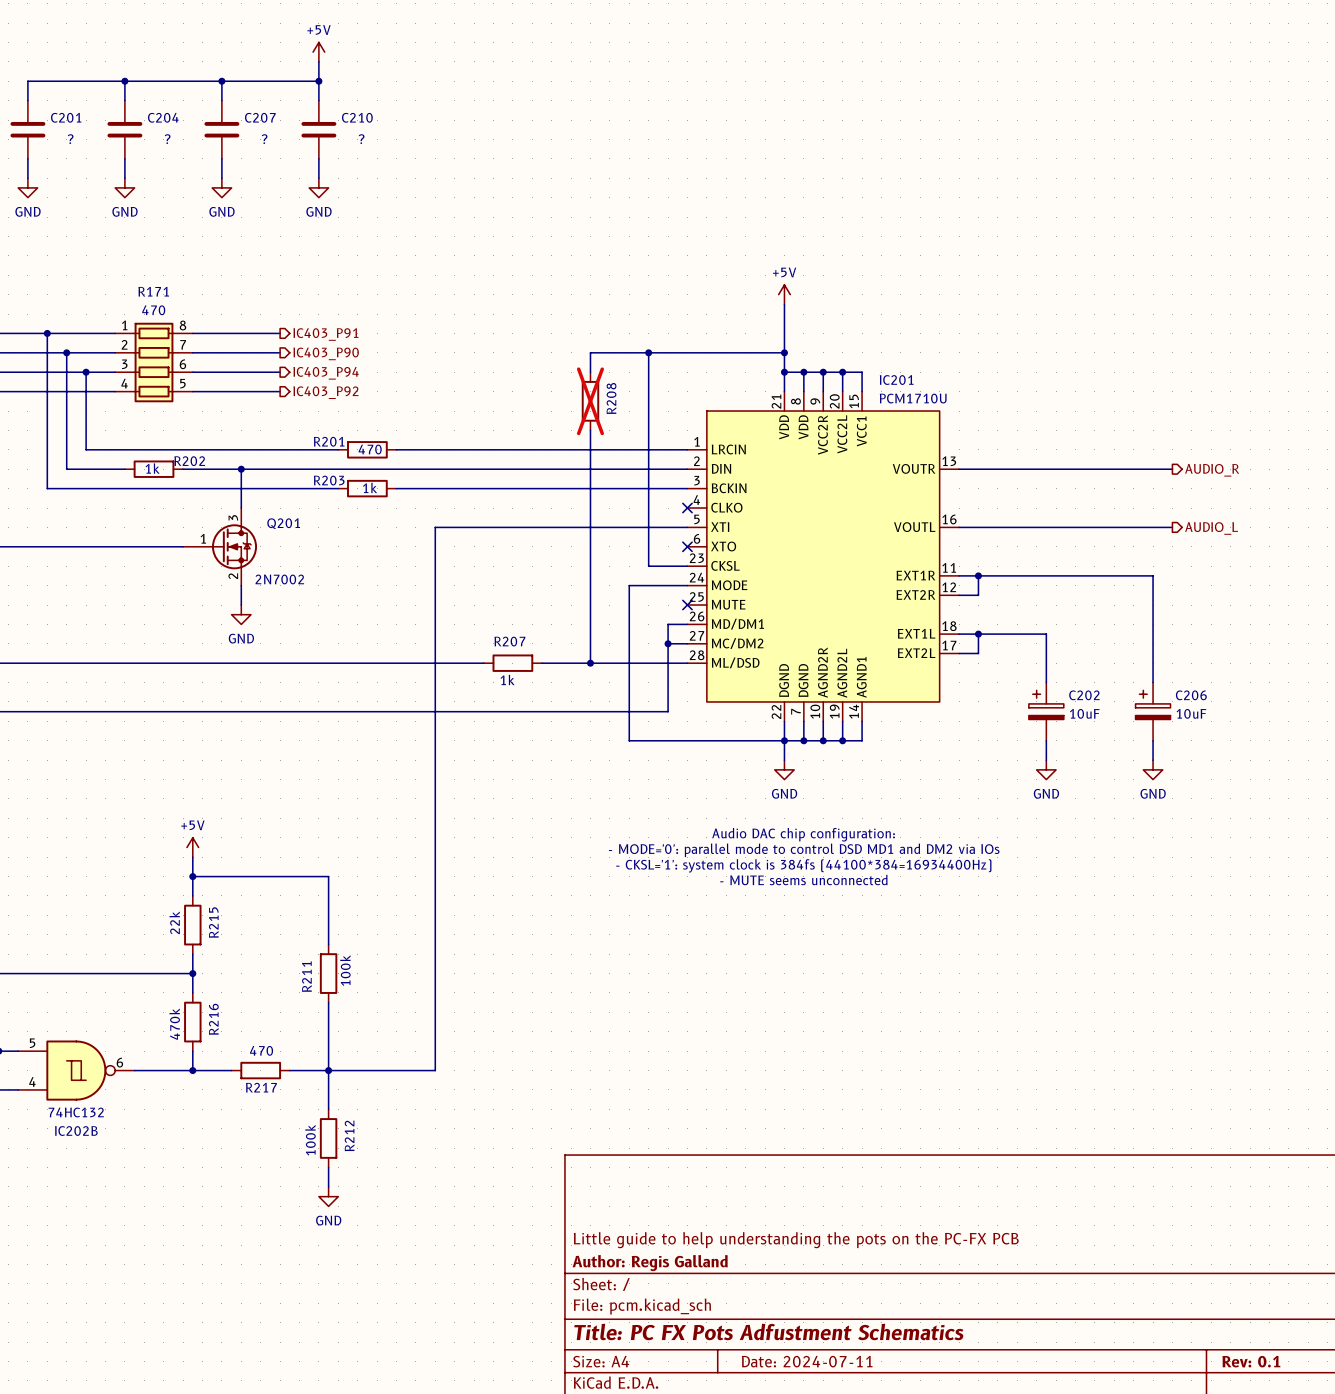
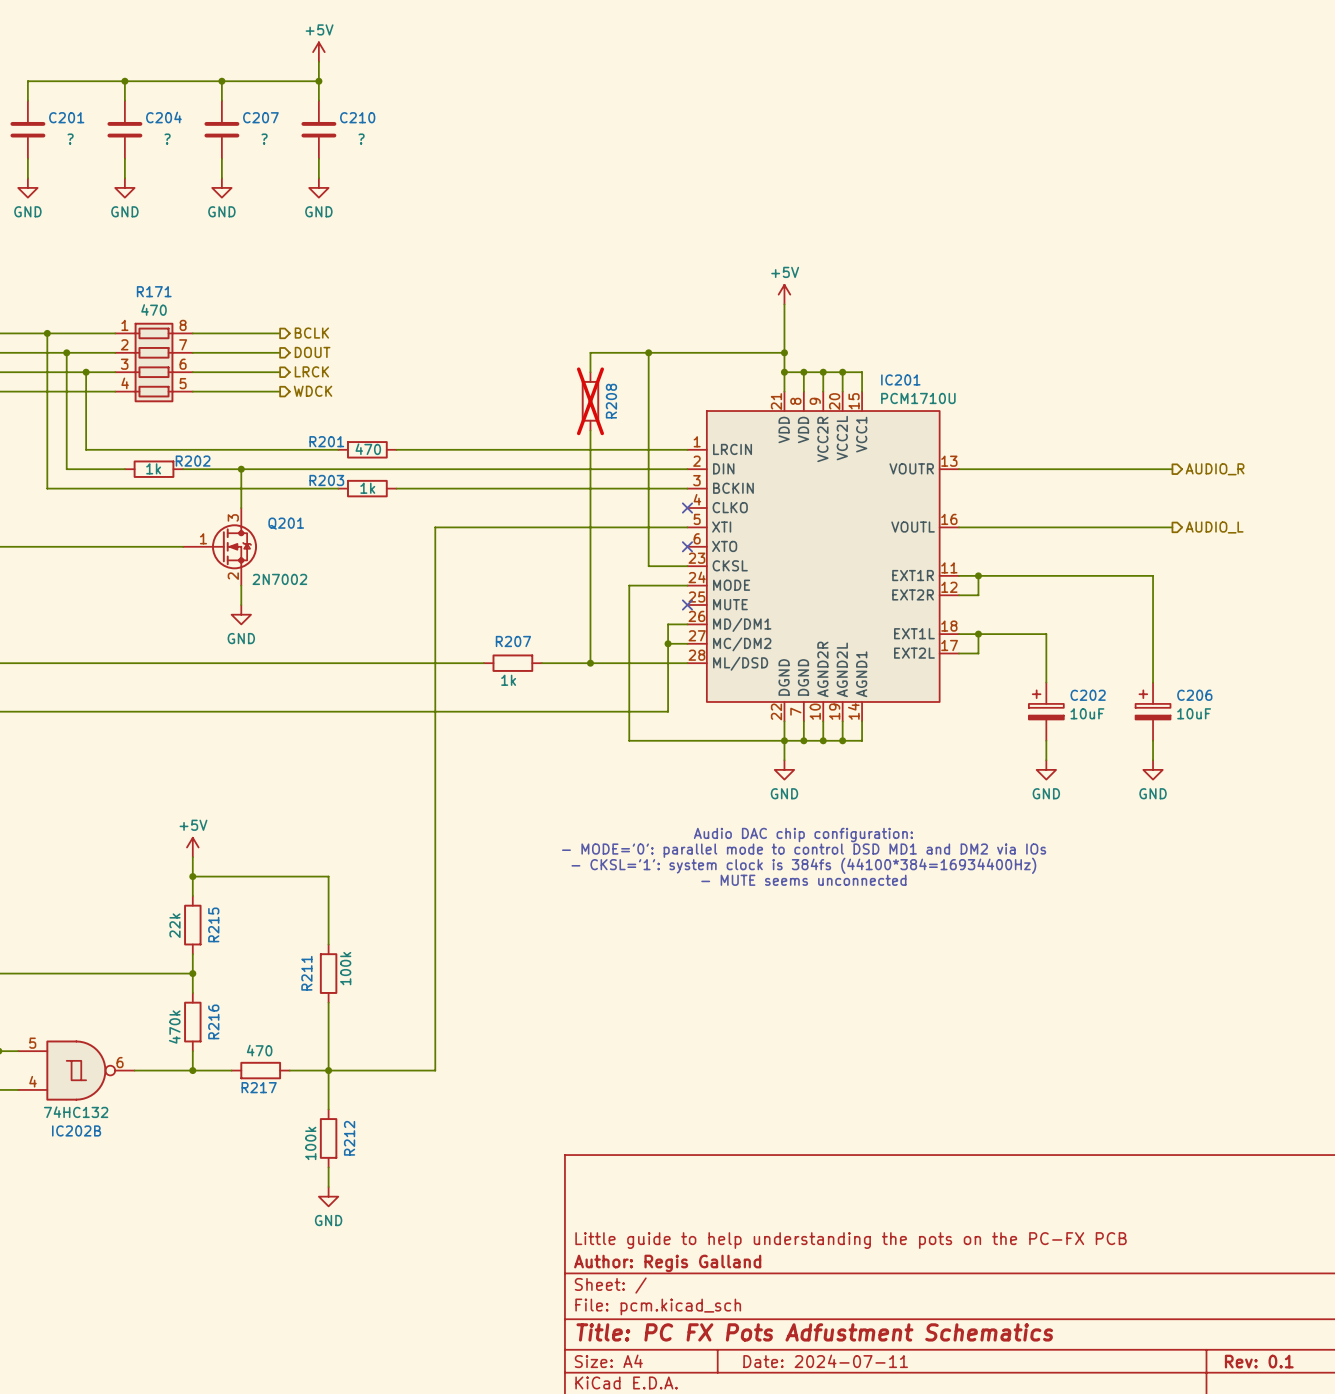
hierarchical label: IC403_P91 (325, 334) -> BCLK (311, 333)
hierarchical label: IC403_P90 (326, 353) -> DOUT (312, 352)
hierarchical label: IC403_P94 (326, 373) -> LRCK (311, 371)
hierarchical label: IC403_P92 (325, 392) -> WDCK (313, 391)

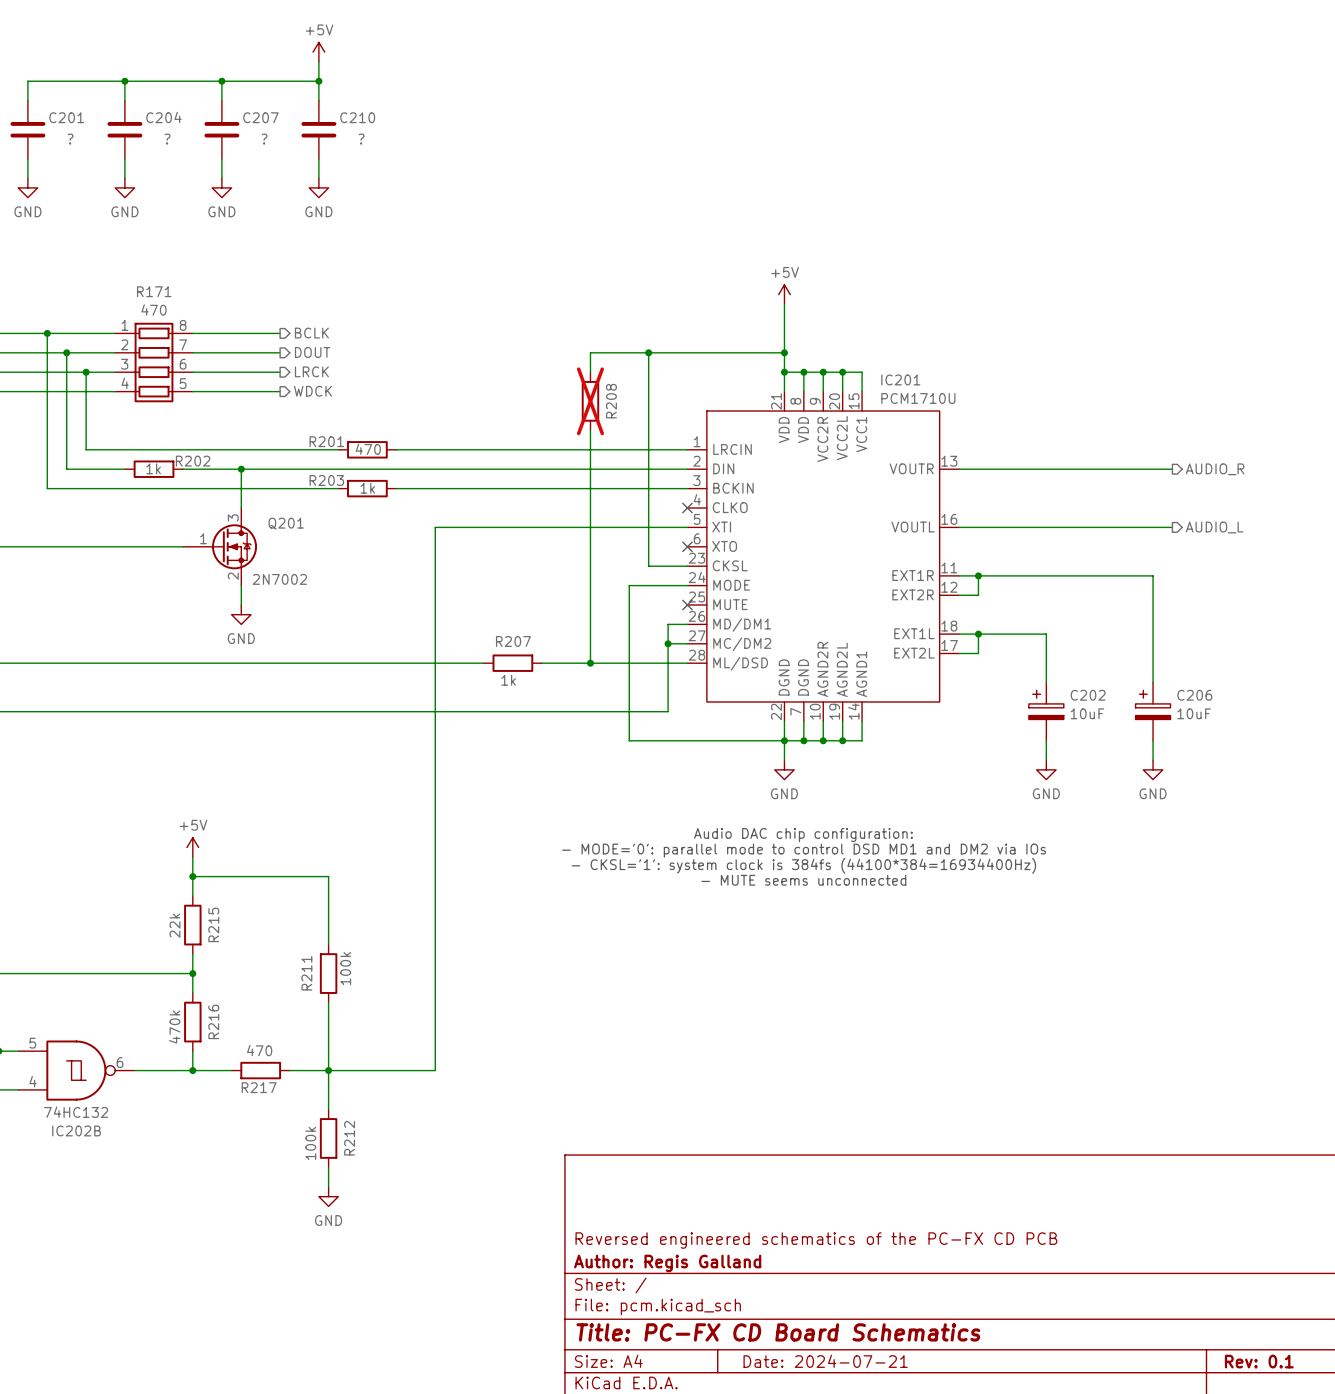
title block: Little guide to help understanding the pots on the PC-FX PCB (851, 1240) -> Reversed engineered schematics of the PC-FX CD PCB (816, 1240)
title block: Title: PC FX Pots Adfustment Schematics (814, 1332) -> Title: PC-FX CD Board Schematics (778, 1332)
title block: Date: 2024-07-11 (825, 1361) -> Date: 2024-07-21 (825, 1361)

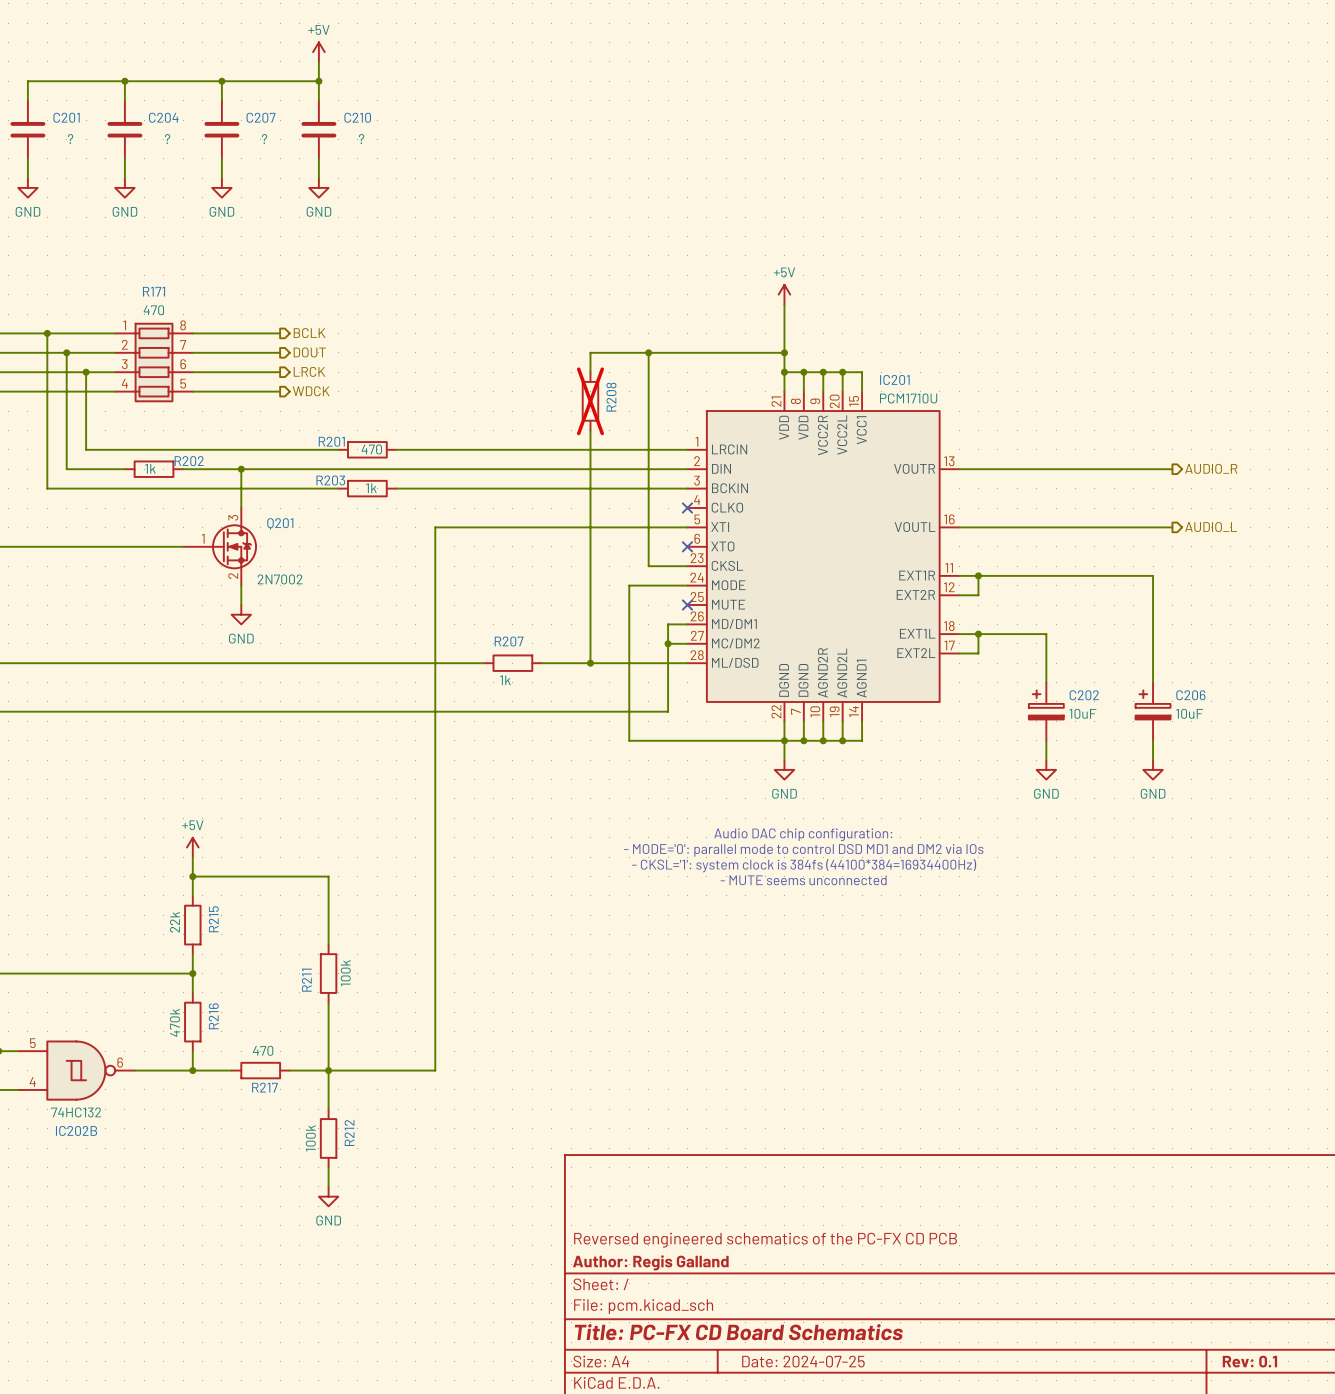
title block: Date: 2024-07-21 (825, 1361) -> Date: 2024-07-25 (803, 1361)

